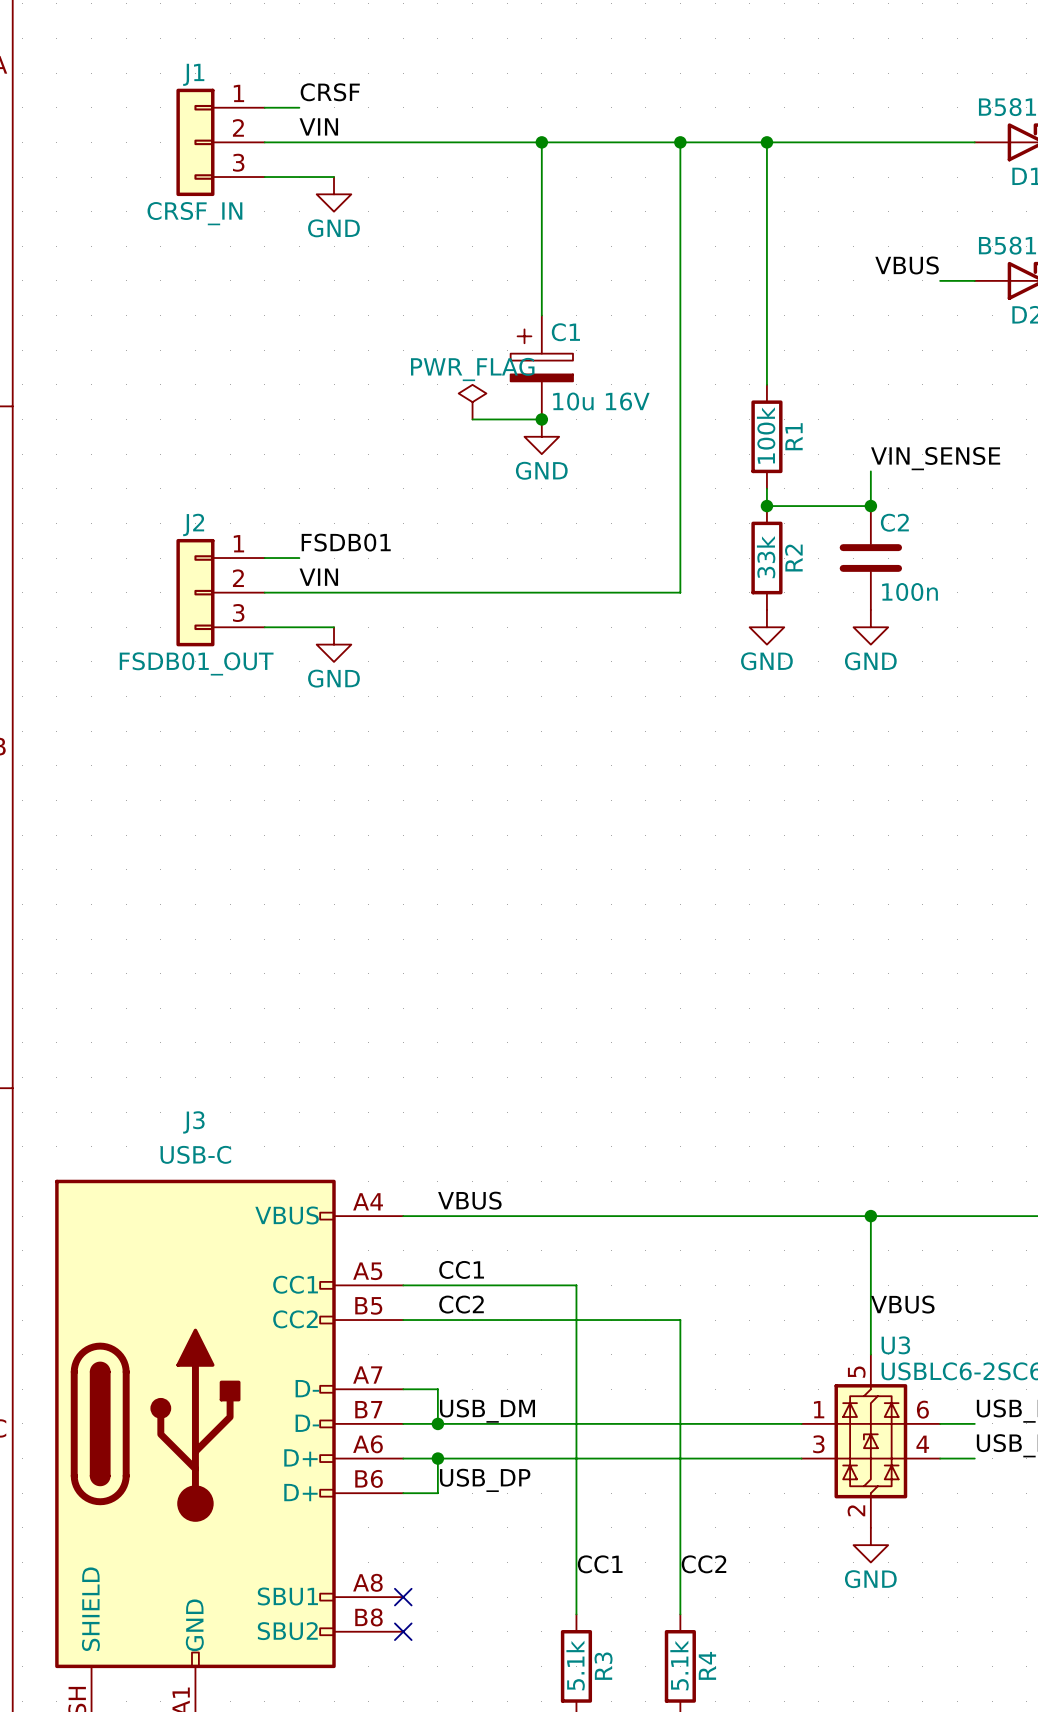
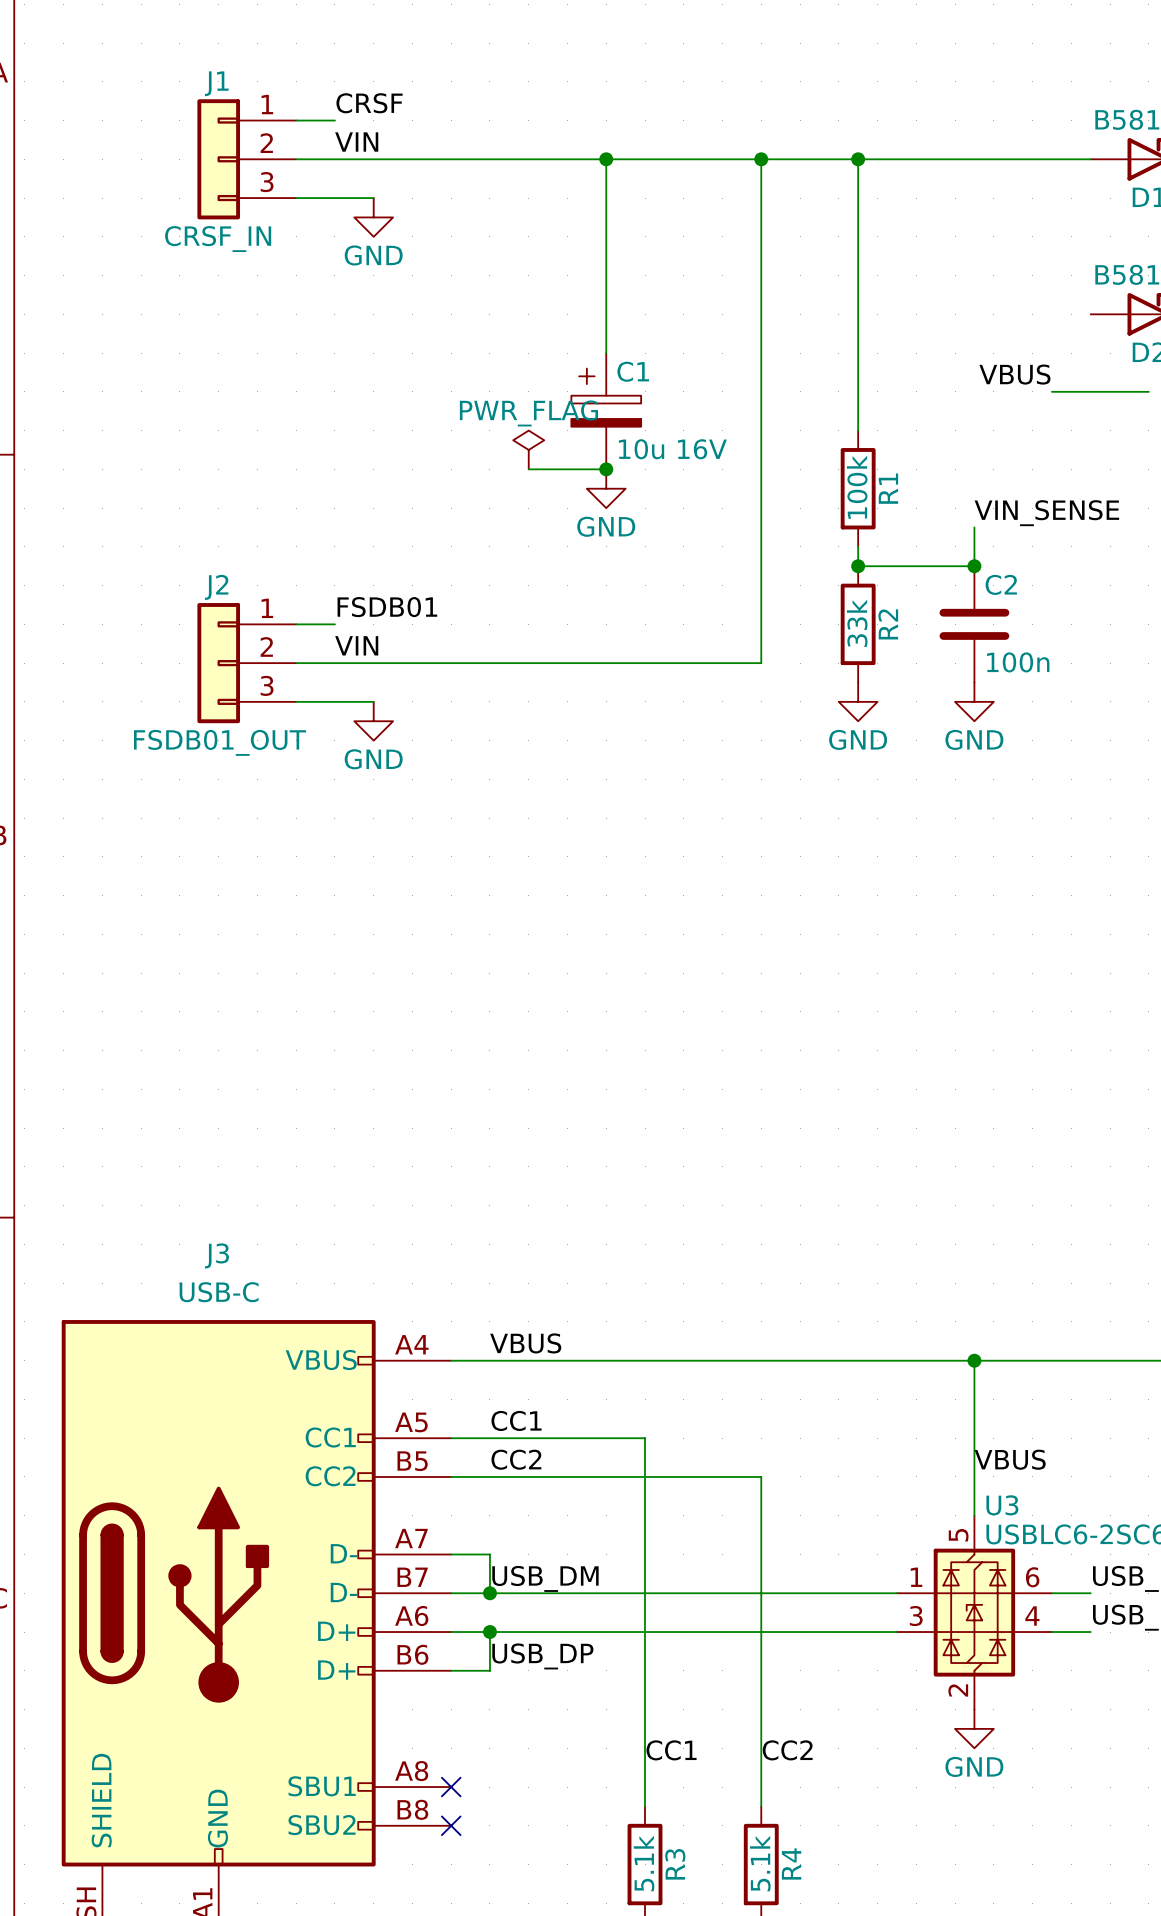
label position: VBUS (907, 265) -> VBUS (1014, 374)
wire: (940, 280) (974, 280) -> none
wire: none -> (1051, 391) (1148, 391)

